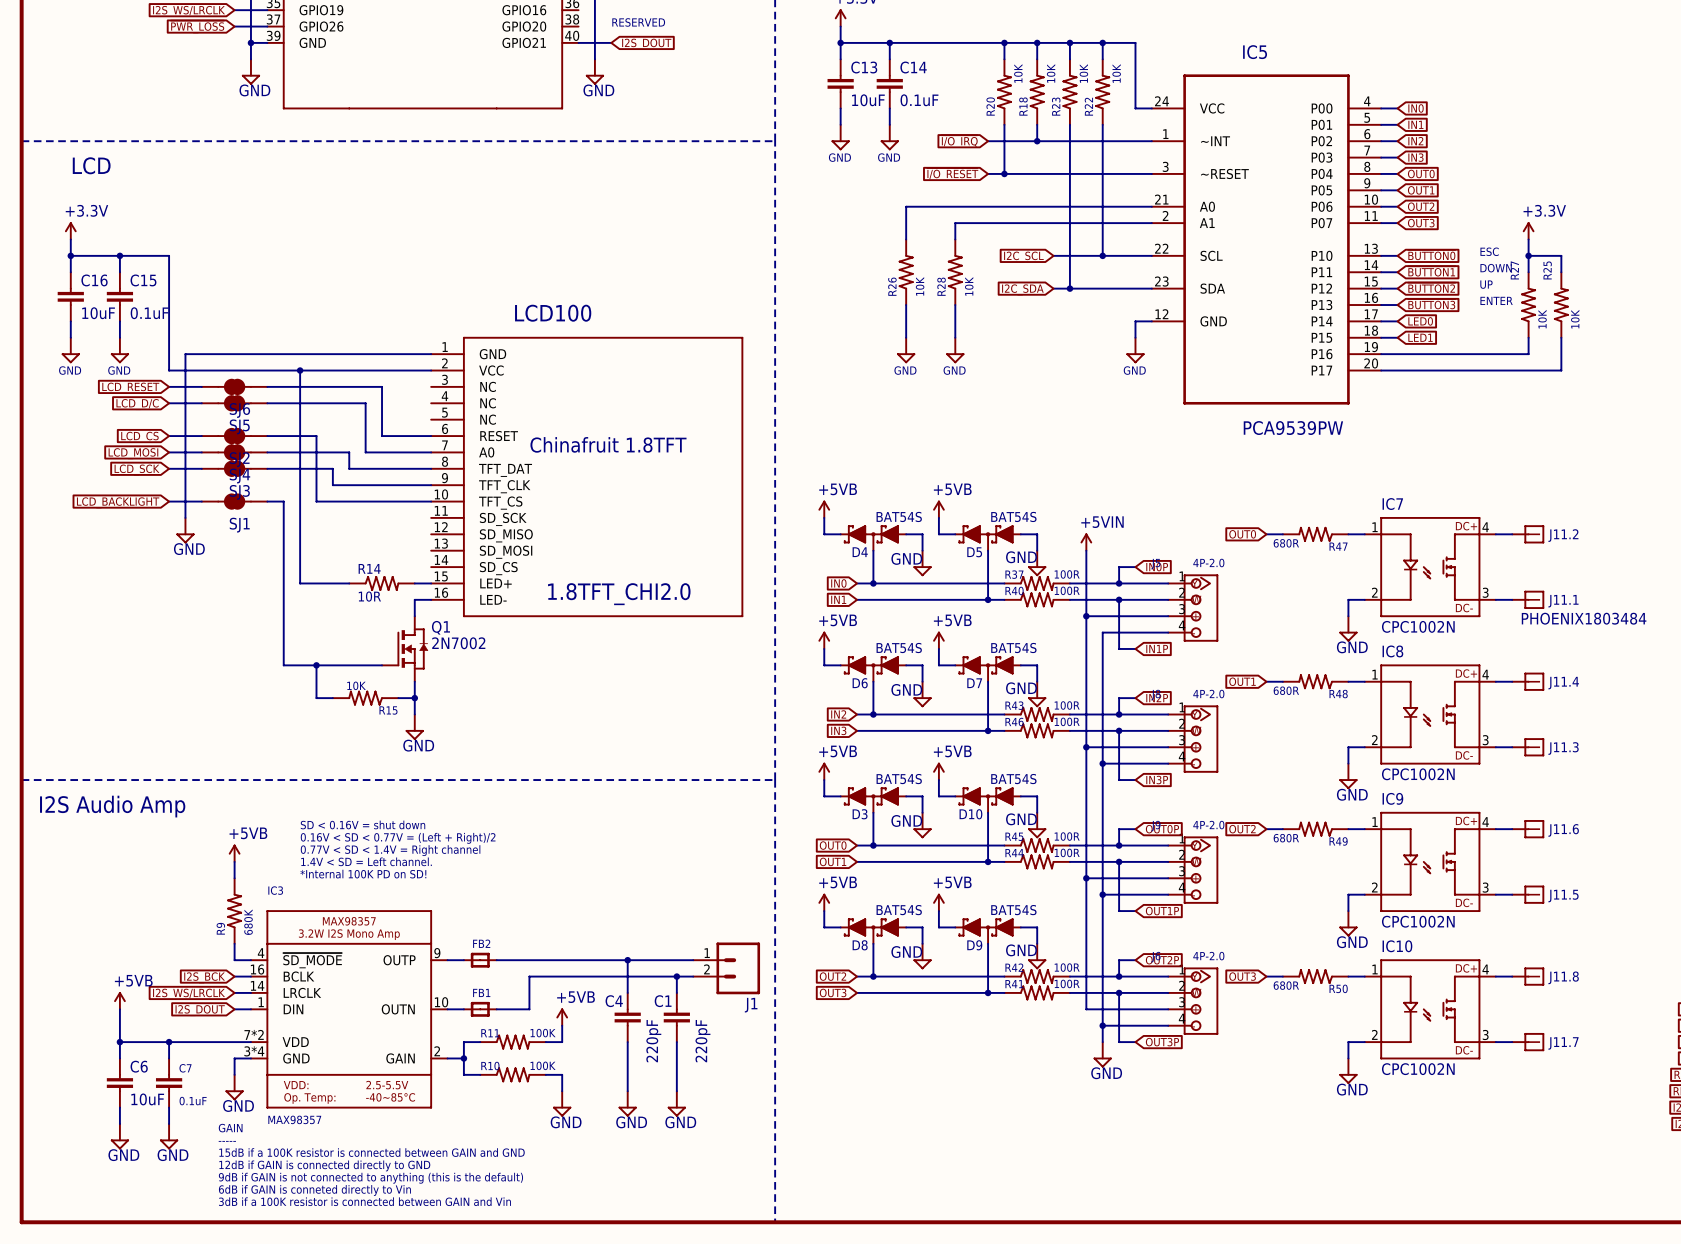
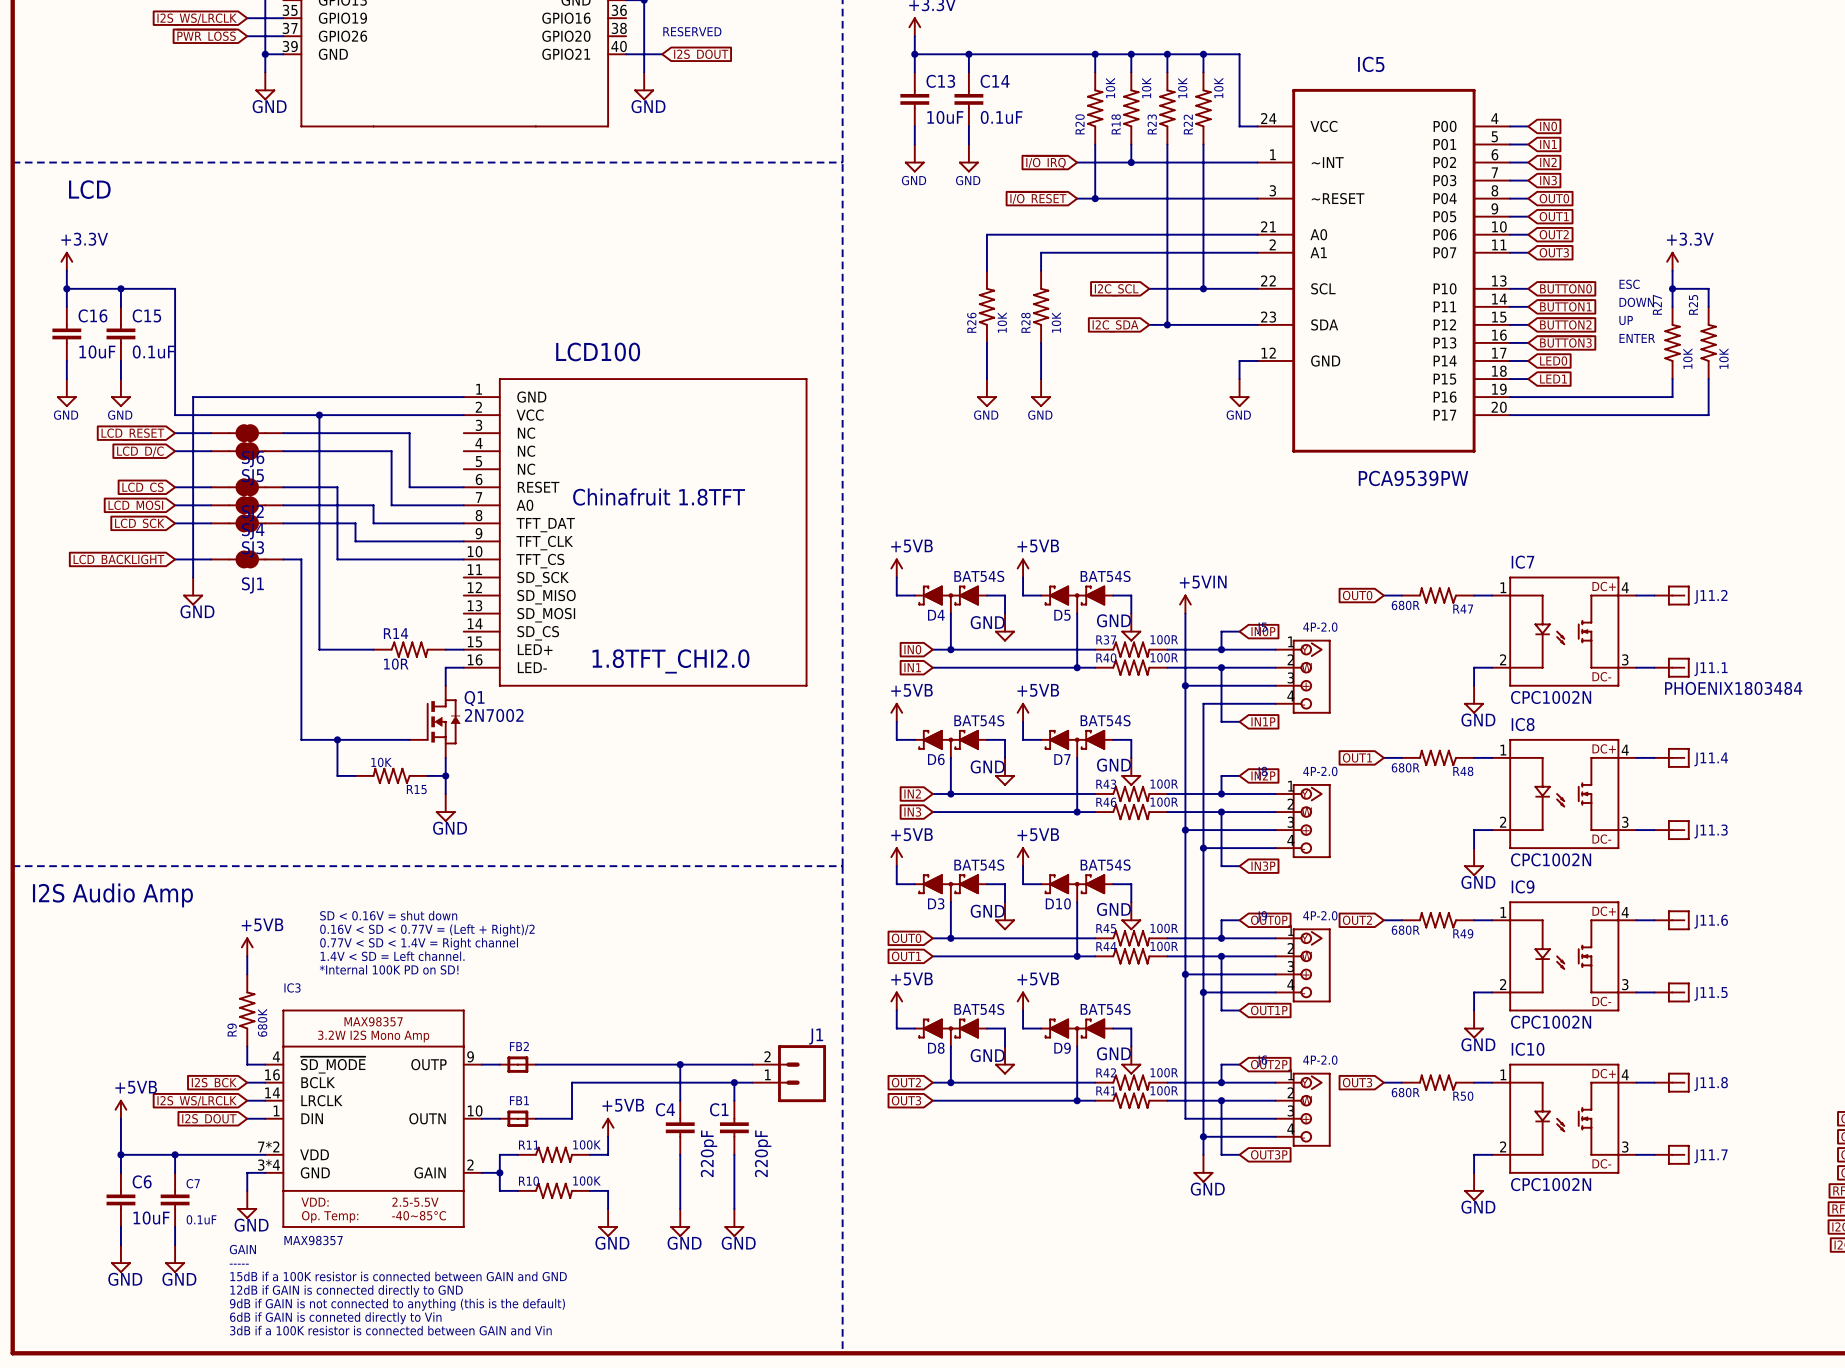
J1 flip: as is (738, 968) -> up-down (802, 1073)

